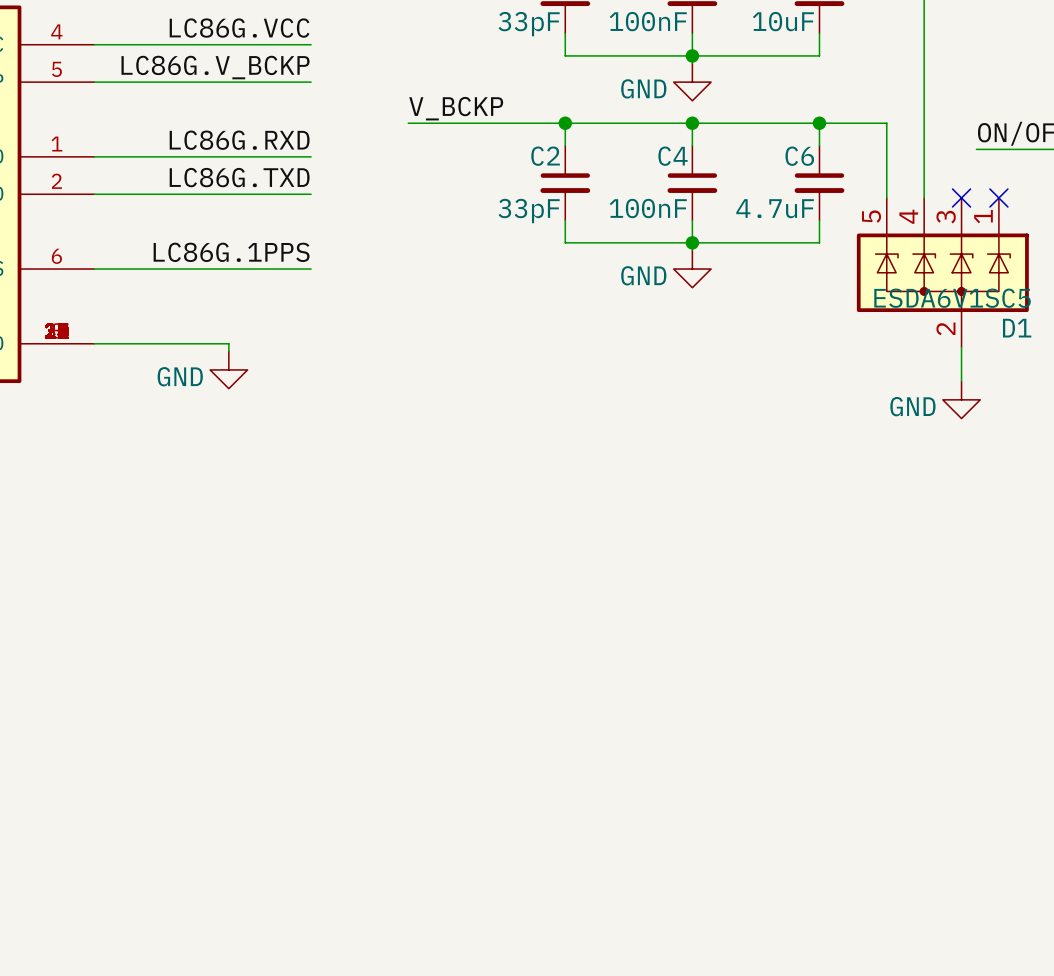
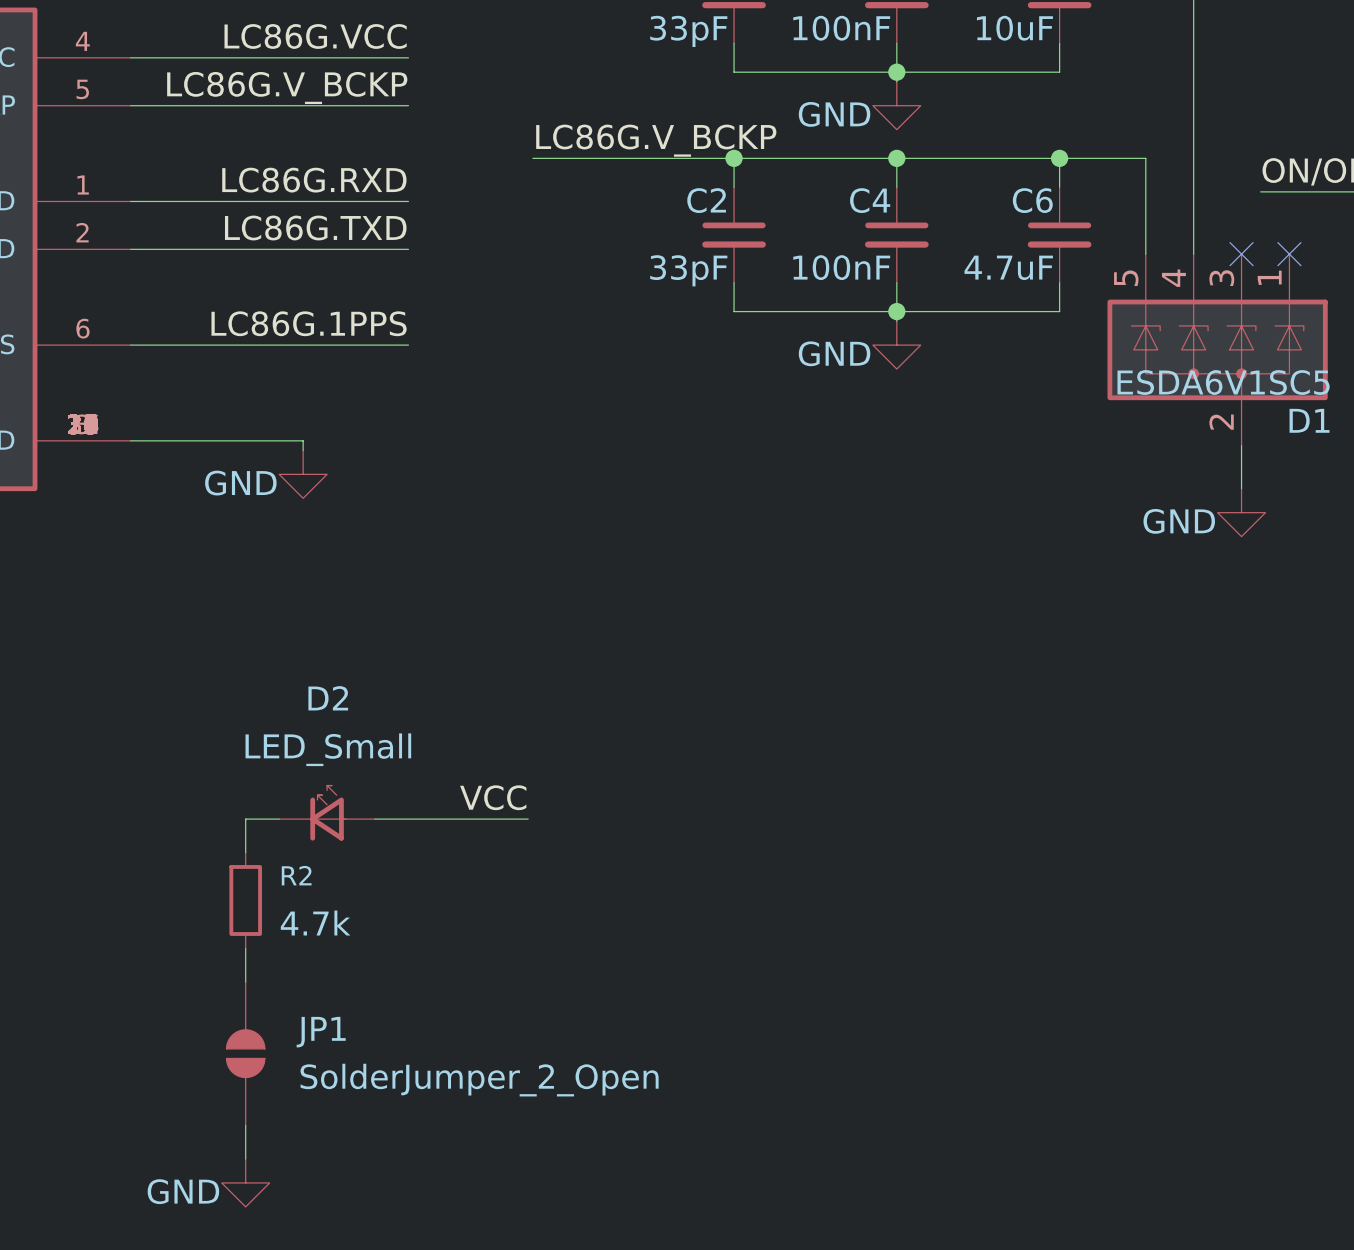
label: V_BCKP (456, 108) -> LC86G.V_BCKP (656, 140)
label: none -> VCC (493, 797)
D2: none -> LED_Small (327, 813)
wire: none -> (279, 819) (245, 819) (245, 852)
wire: none -> (374, 819) (528, 819)
R2: none -> 4.7k (245, 900)
wire: none -> (245, 948) (245, 981)
JP1: none -> SolderJumper_2_Open (245, 1053)
wire: none -> (245, 1125) (245, 1159)
power symbol: none -> GND (245, 1182)

